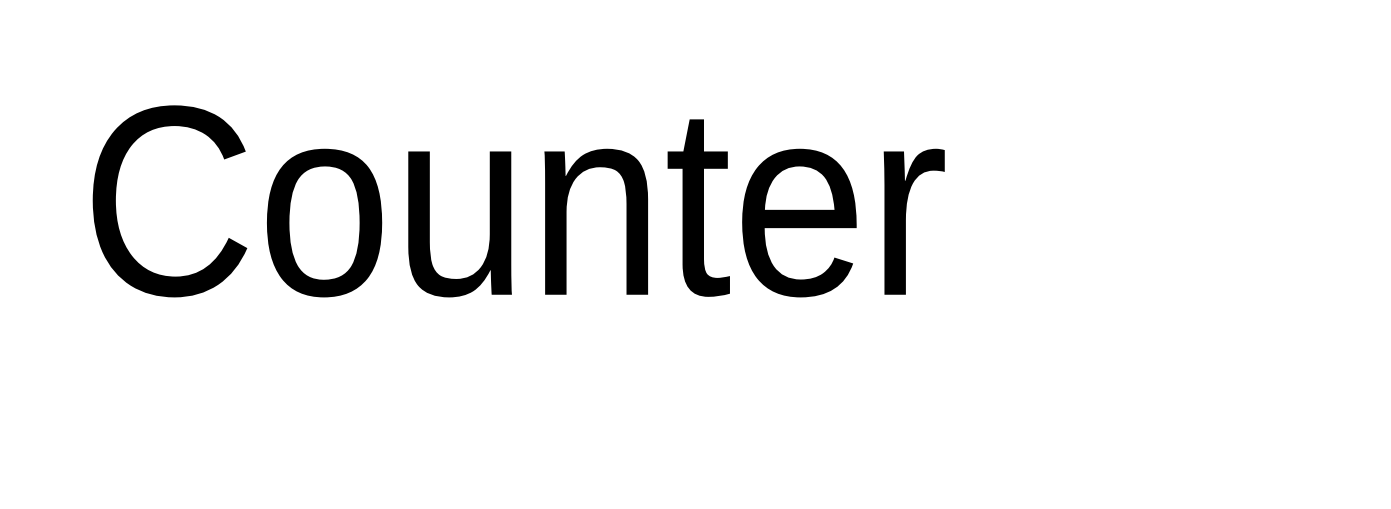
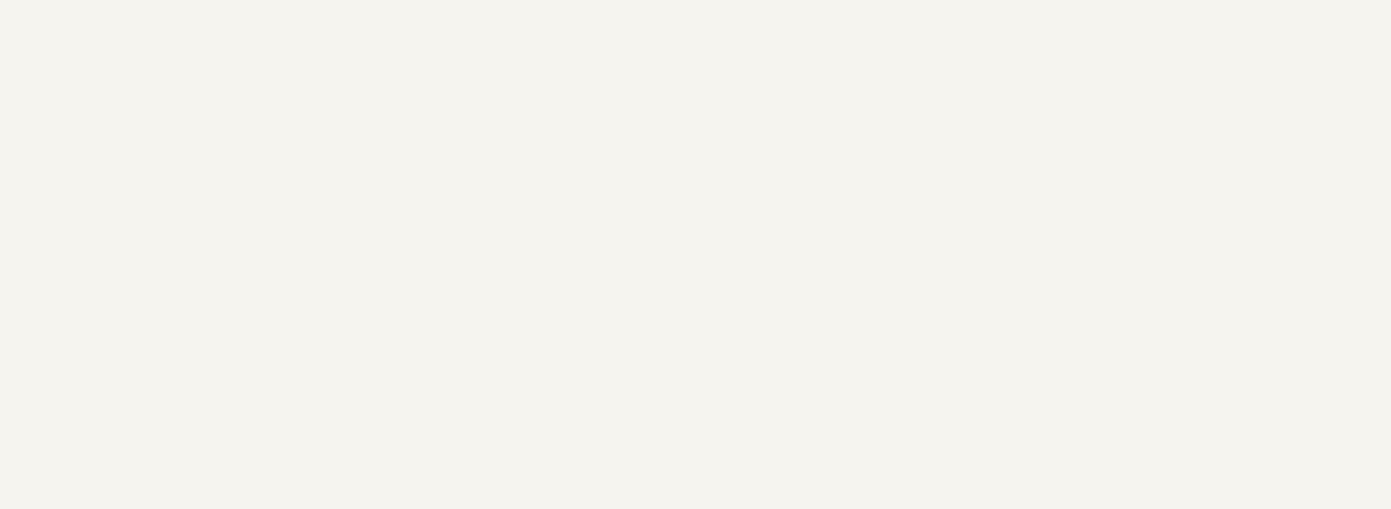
text: Counter (518, 201) -> none

